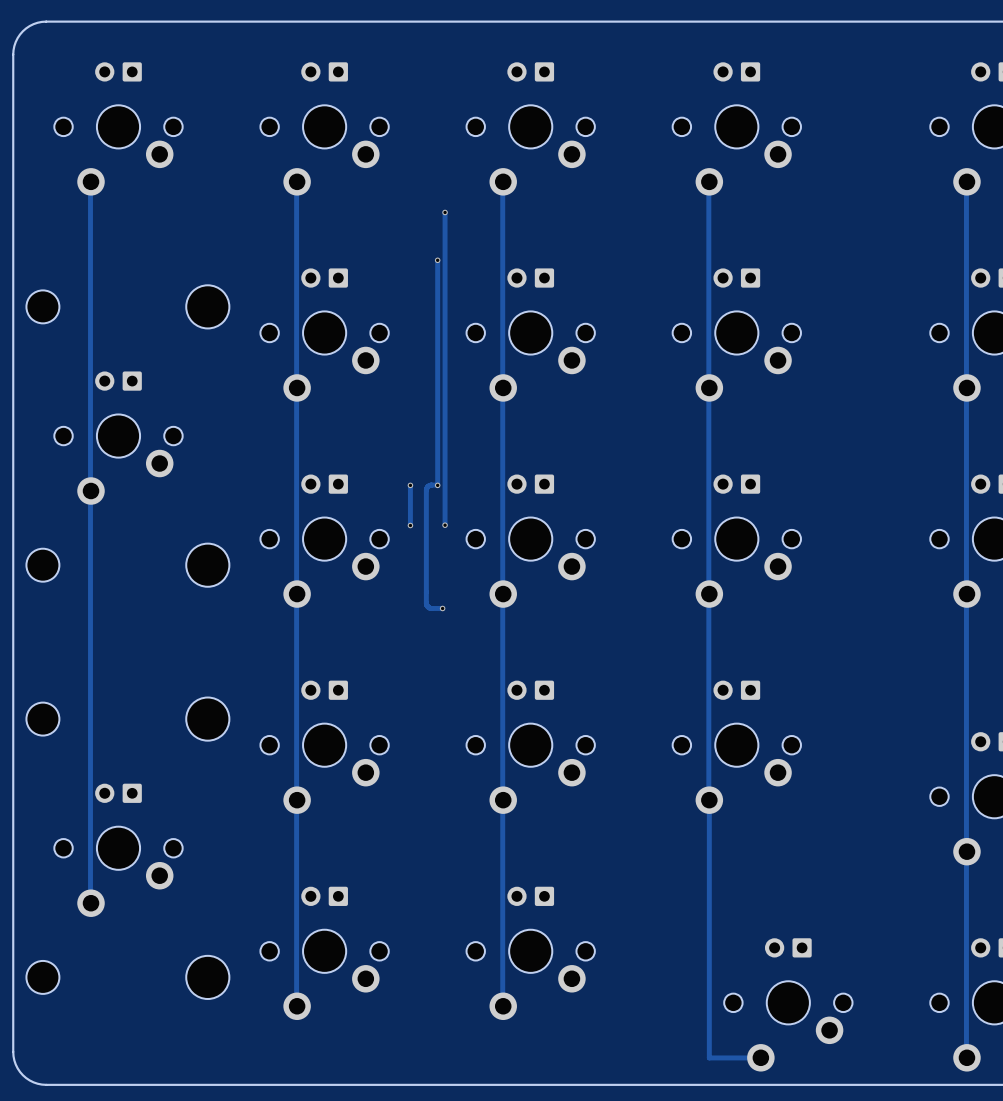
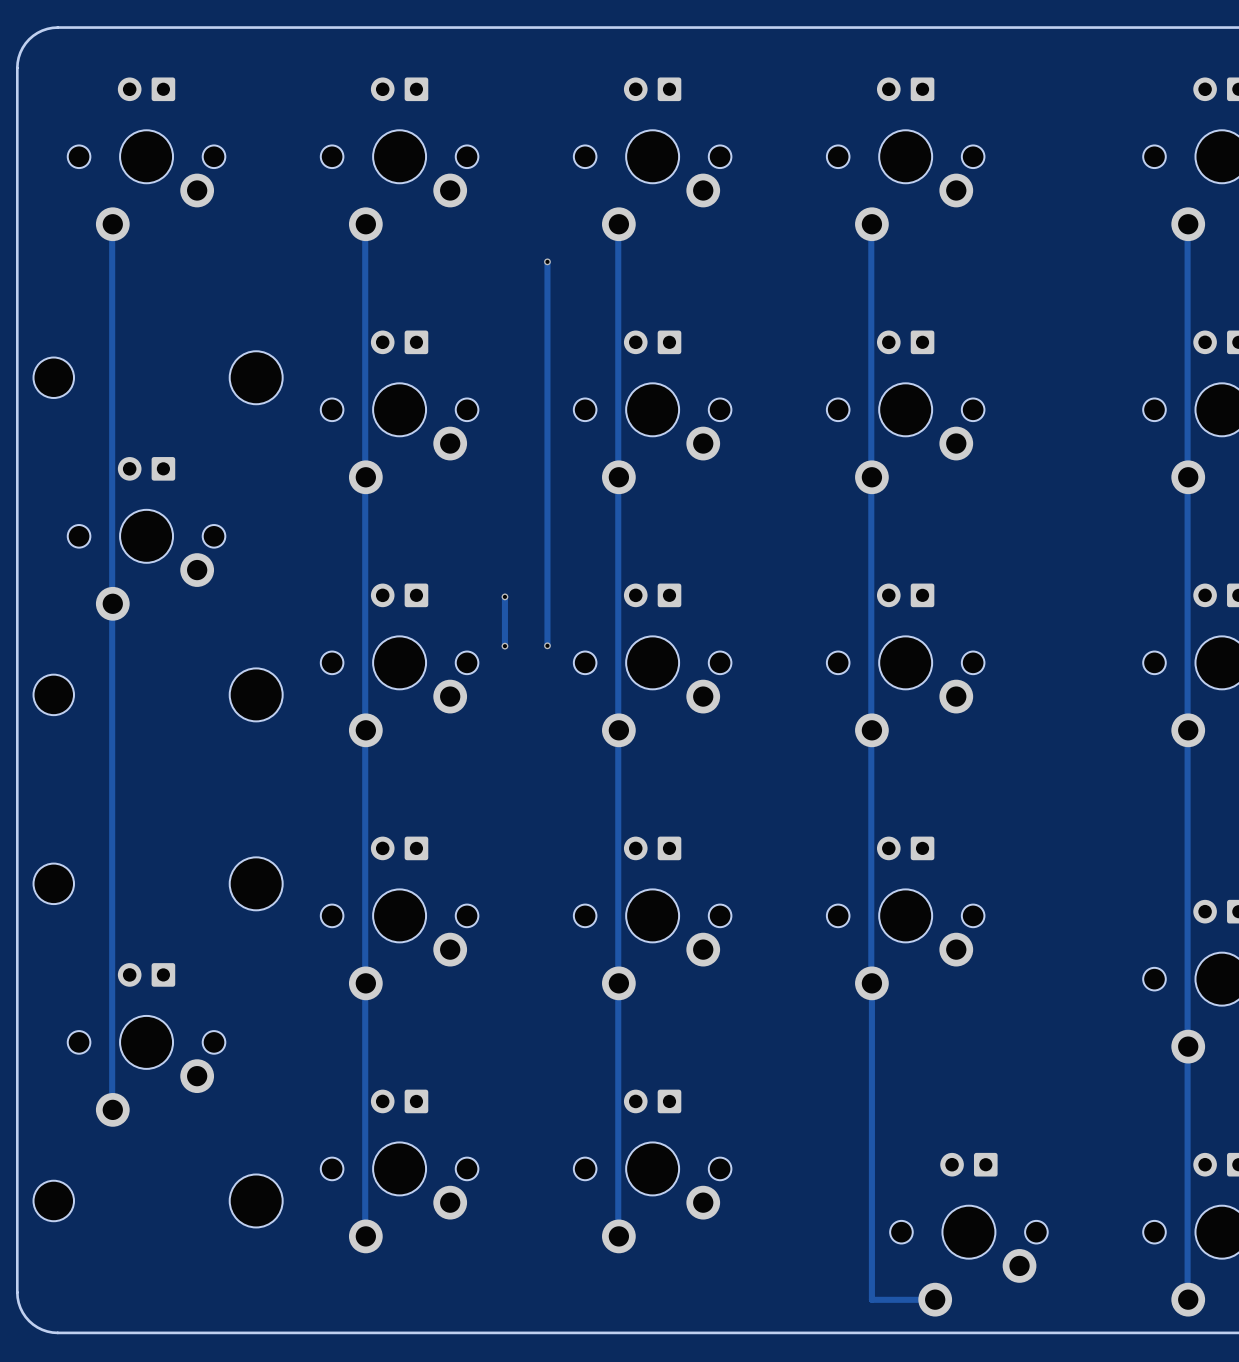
track: (437, 260) (437, 485) (429, 485) (426, 489) (426, 603) (430, 608) (442, 608) -> none
via: (437, 260) -> none
via: (437, 485) -> none
via: (442, 608) -> none

